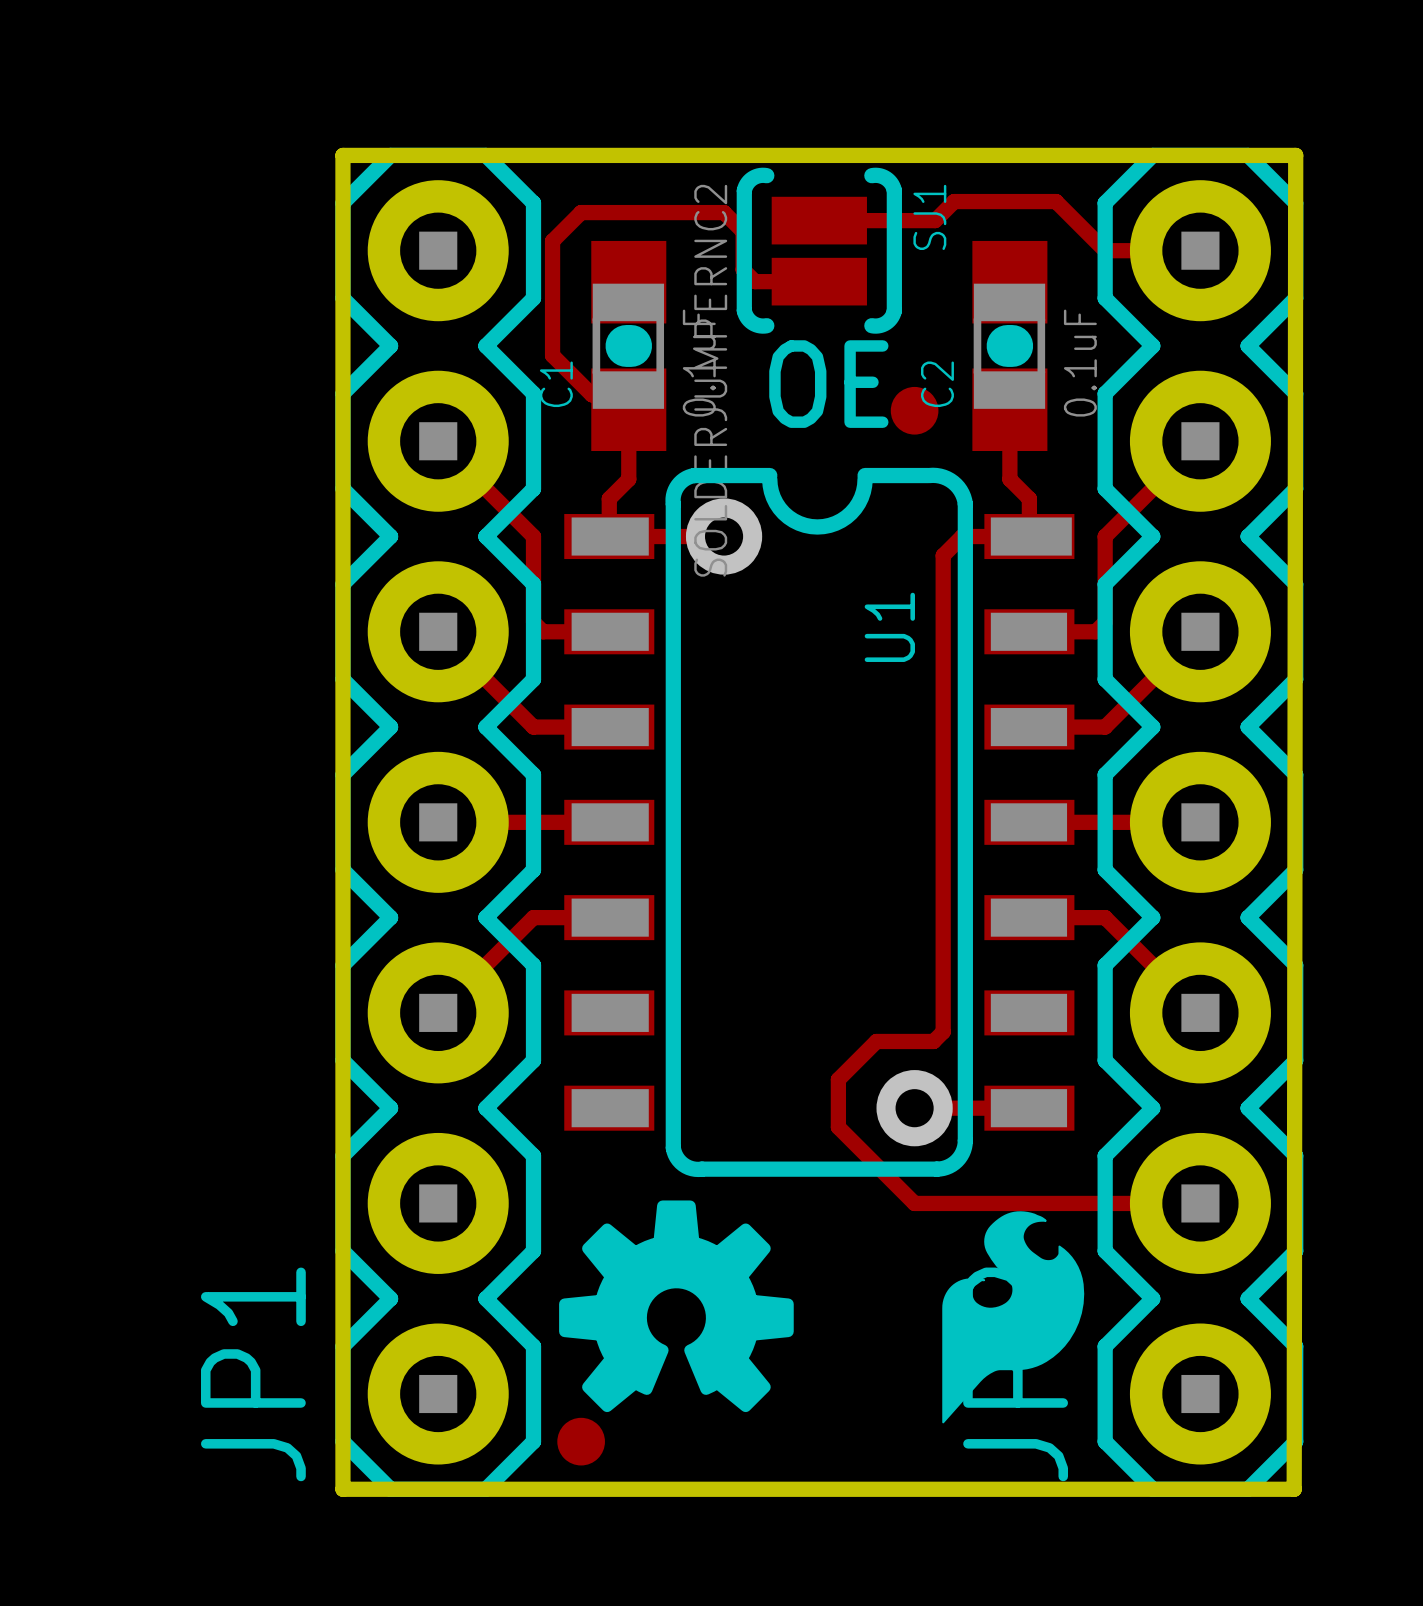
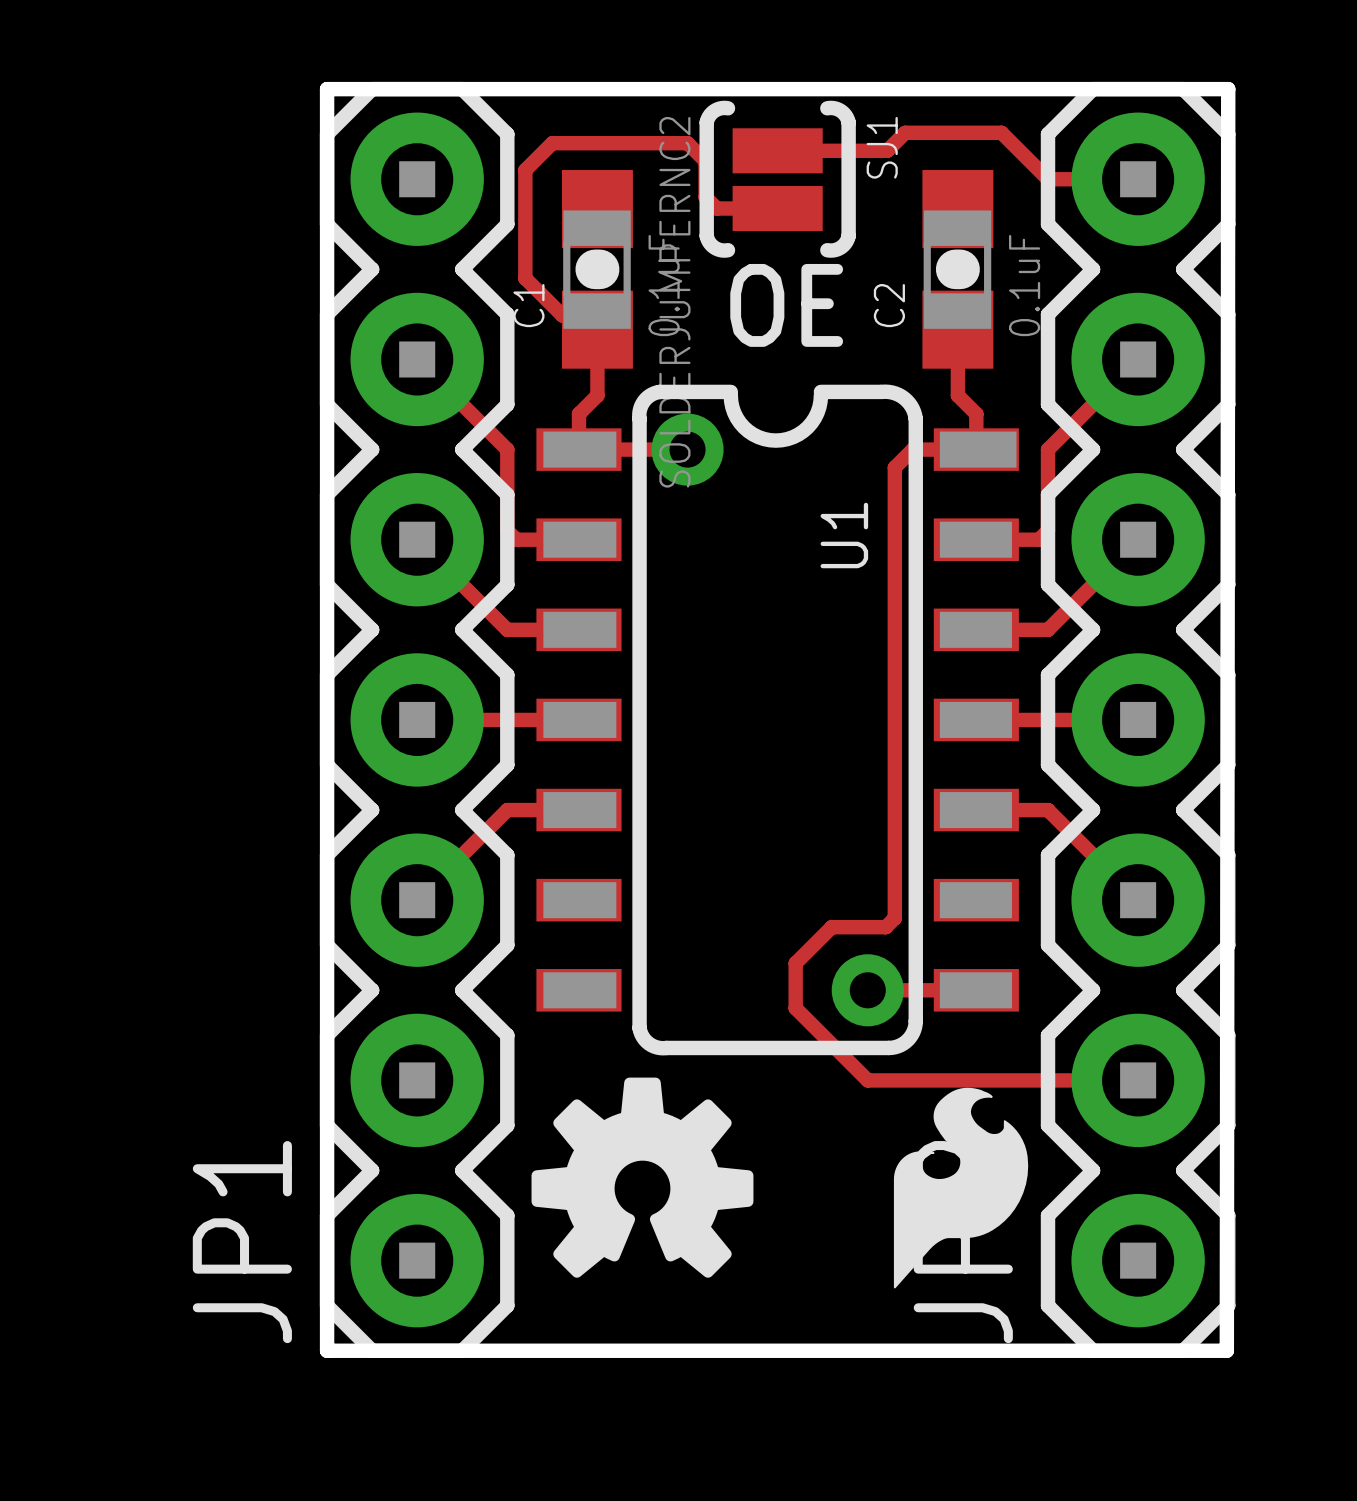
part: (914, 410) -> none
part: (581, 1441) -> none

